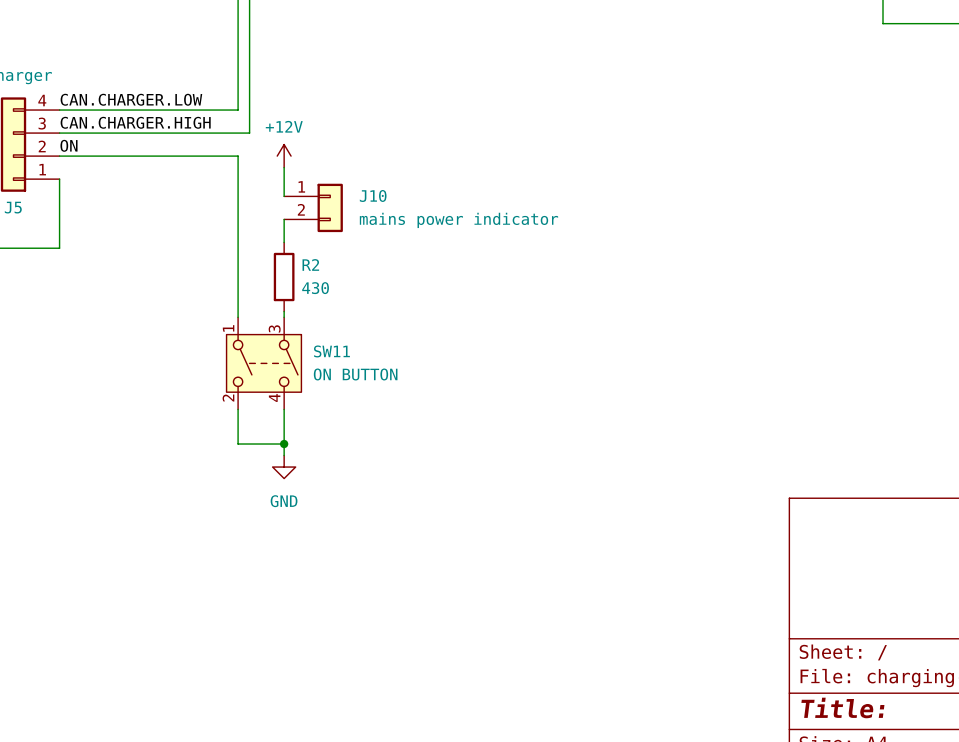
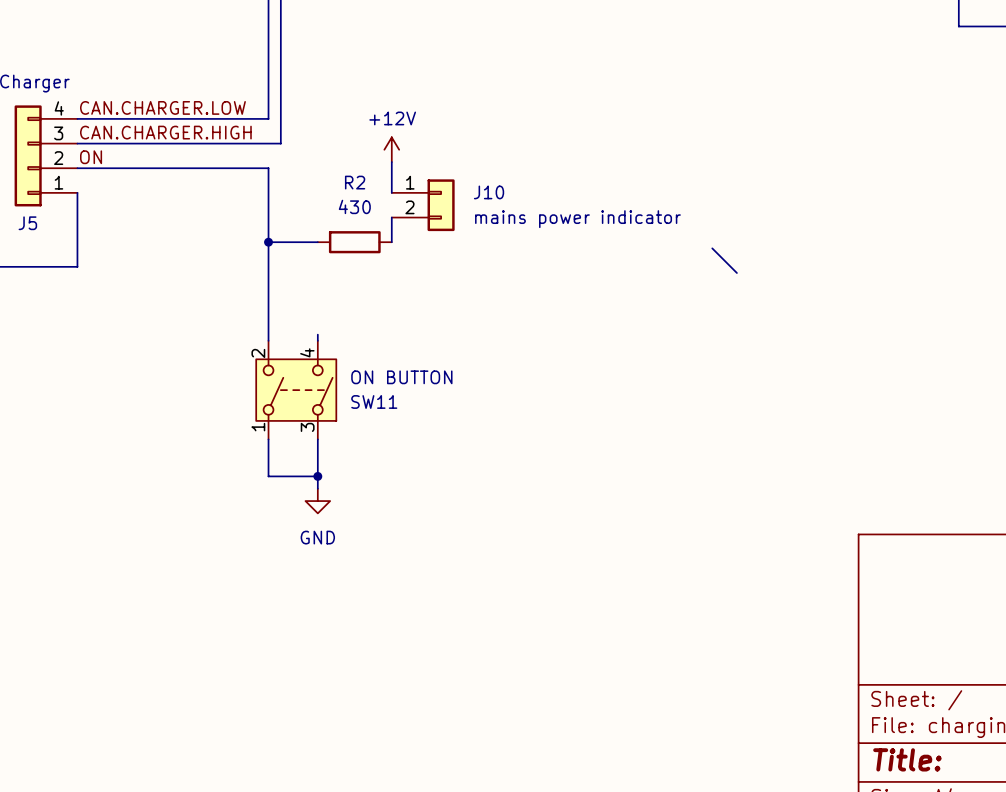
power symbol position: +12V (284, 156) -> +12V (391, 149)
wire: (284, 167) (284, 196) -> (391, 162) (391, 192)
J10 position: (313, 207) -> (423, 205)
wire: (284, 219) (284, 242) -> (391, 217) (391, 242)
wire: none -> (268, 242) (317, 242)
junction: none -> (268, 242)
wire: none -> (712, 248) (736, 273)
R2 name position: R2 (310, 264) -> R2 (355, 182)
R2 rotation: 0° (284, 277) -> 90° clockwise (354, 242)
R2 position: (284, 277) -> (354, 242)
R2 value position: 430 (315, 288) -> 430 (354, 206)
SW11 flip: as is (263, 363) -> up-down (296, 390)

